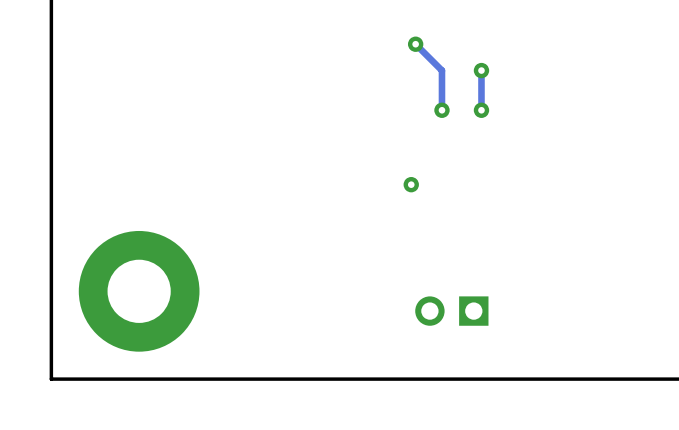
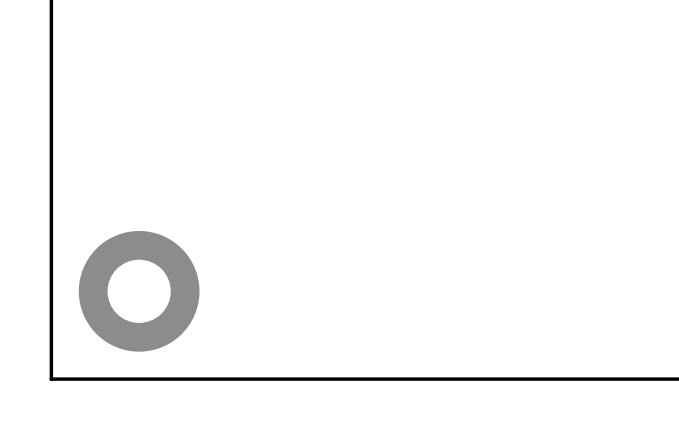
track: (415, 44) (441, 70) (441, 110) -> none
via: (415, 44) -> none
track: (481, 70) (481, 110) -> none
via: (481, 70) -> none
via: (441, 110) -> none
via: (481, 110) -> none
via: (411, 184) -> none
part: (451, 311) -> none

